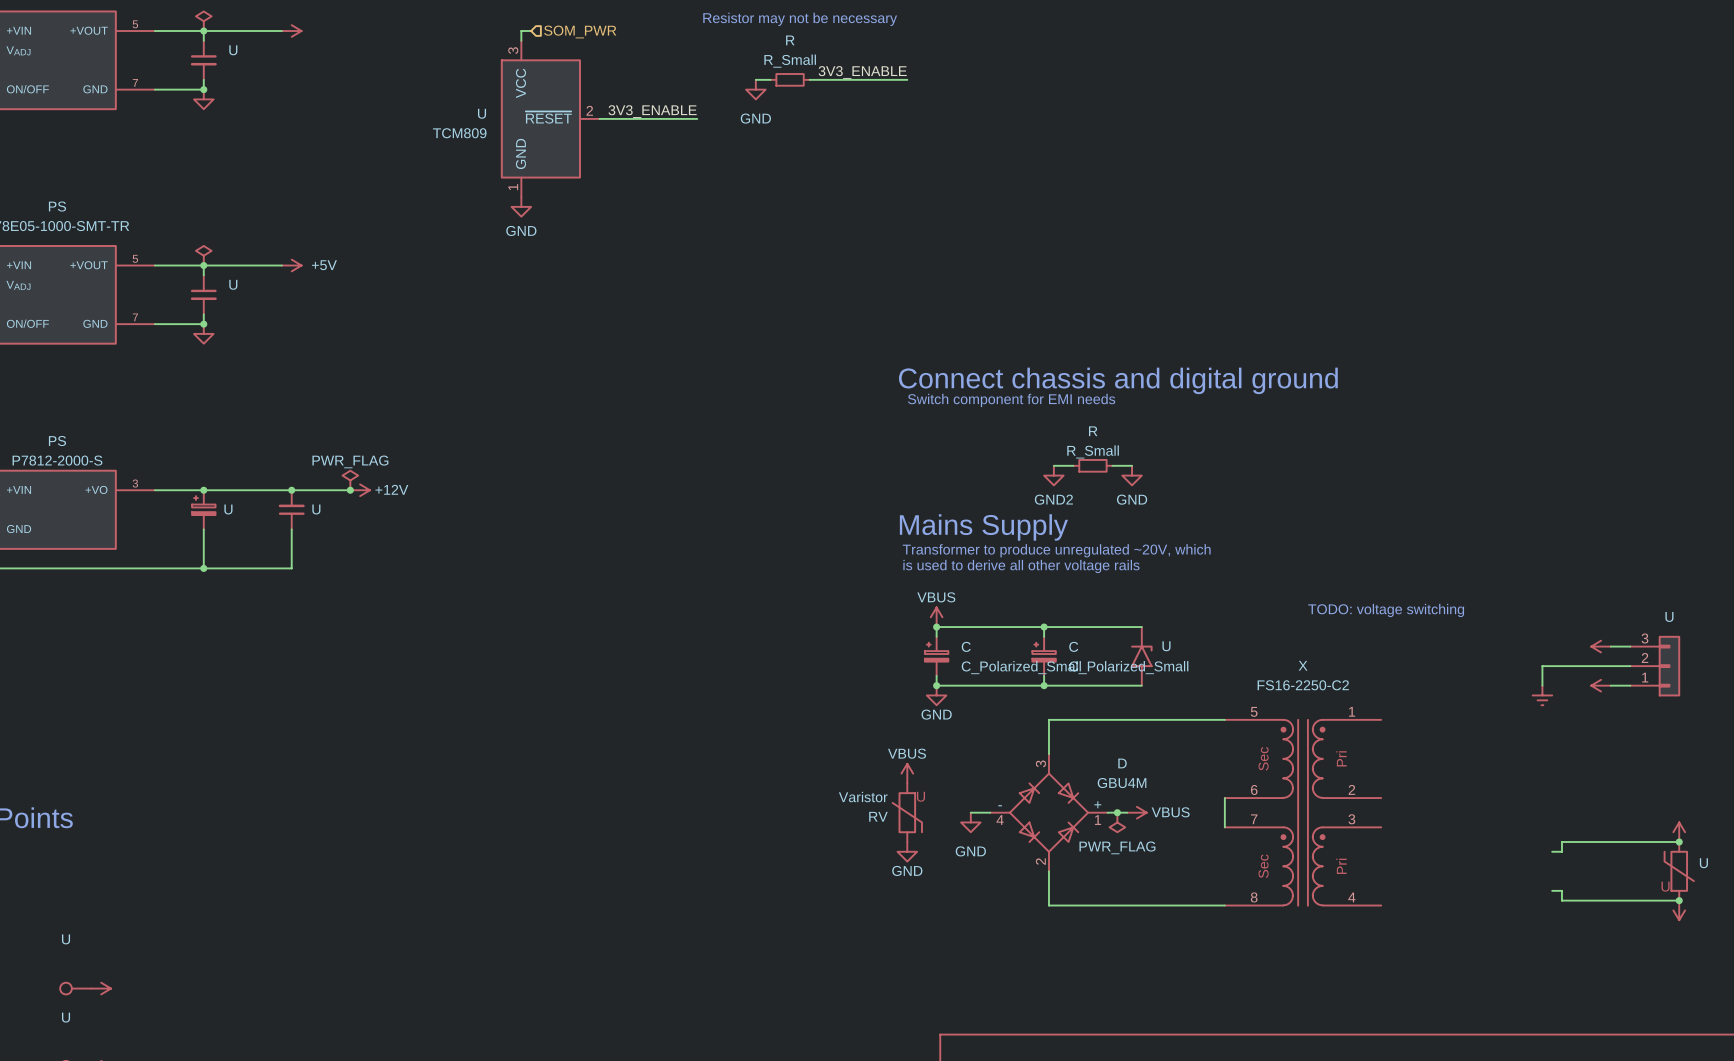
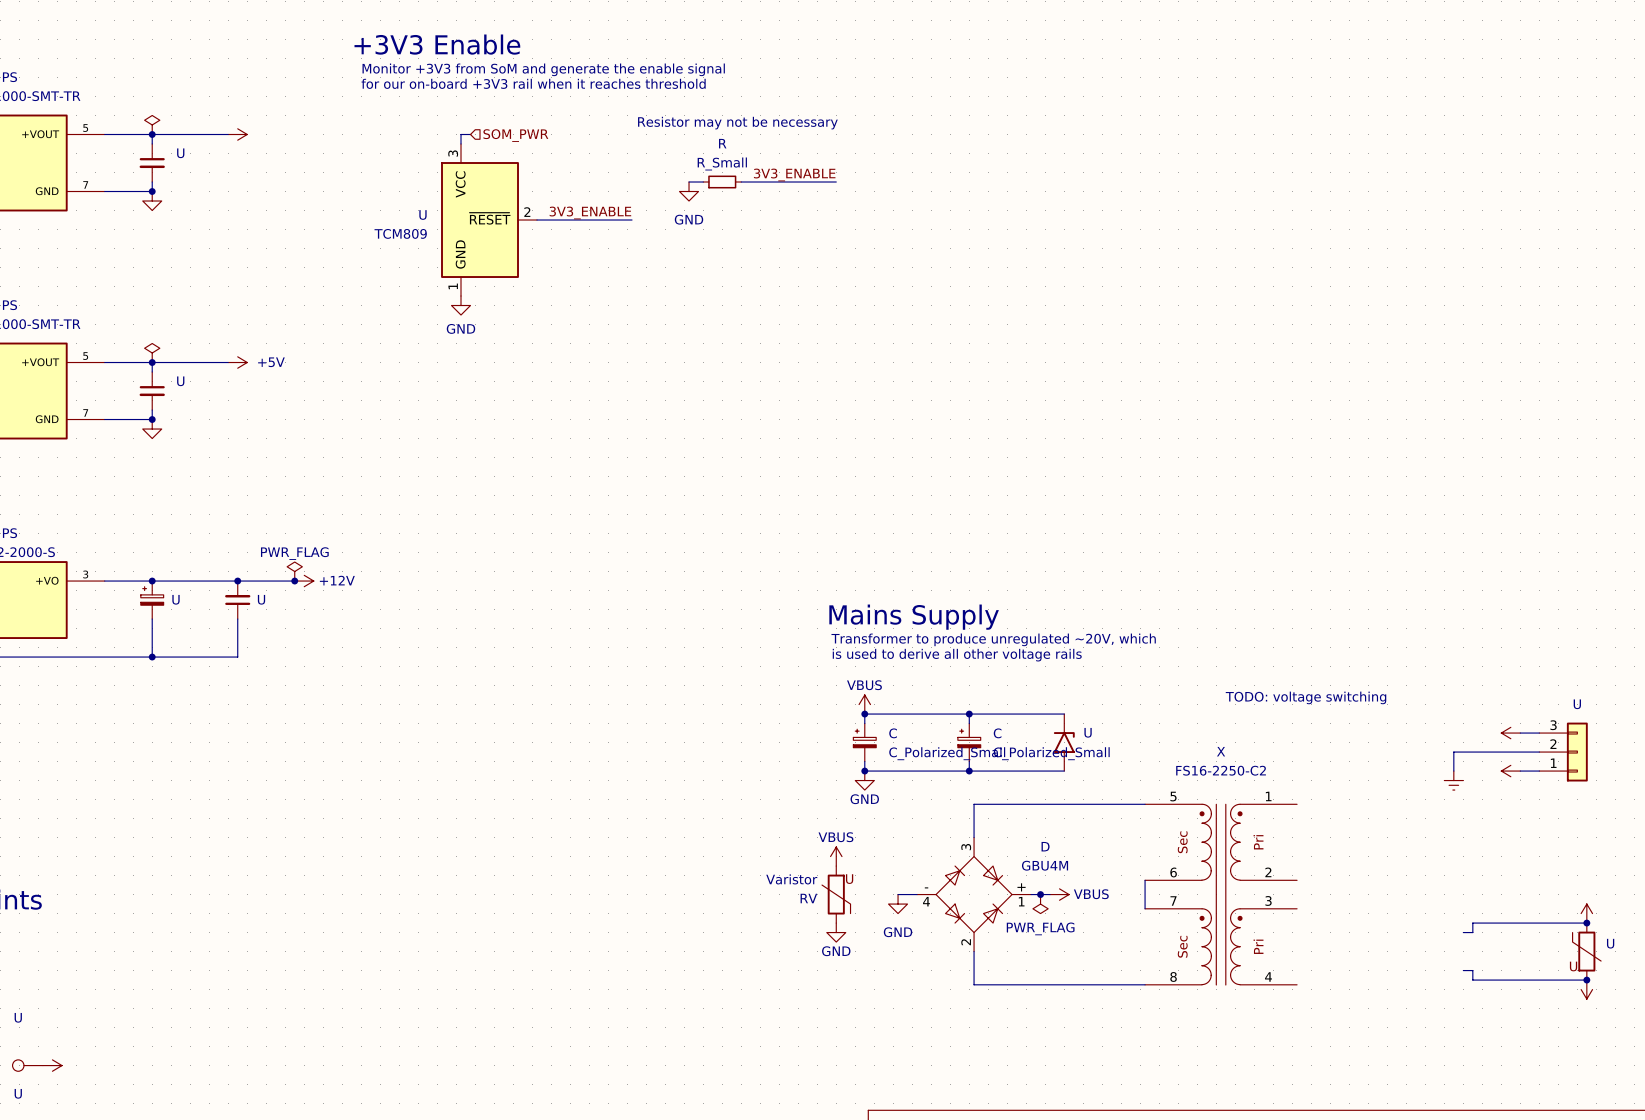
text: Connect chassis and digital ground (1118, 380) -> none
text: Switch component for EMI needs (1011, 400) -> none
wire: (1053, 465) (1073, 465) -> none
R: R_Small (1092, 465) -> none
wire: (1112, 465) (1132, 465) -> none
power symbol: GND2 (1053, 475) -> none
power symbol: GND (1132, 475) -> none

